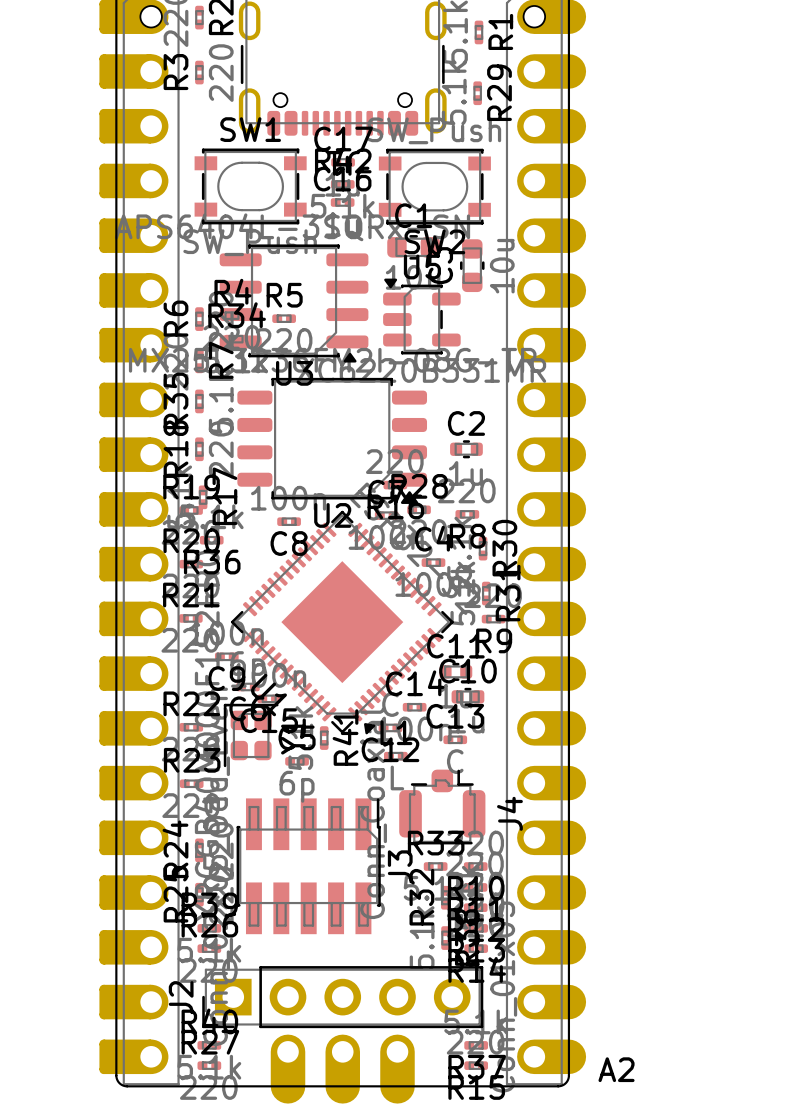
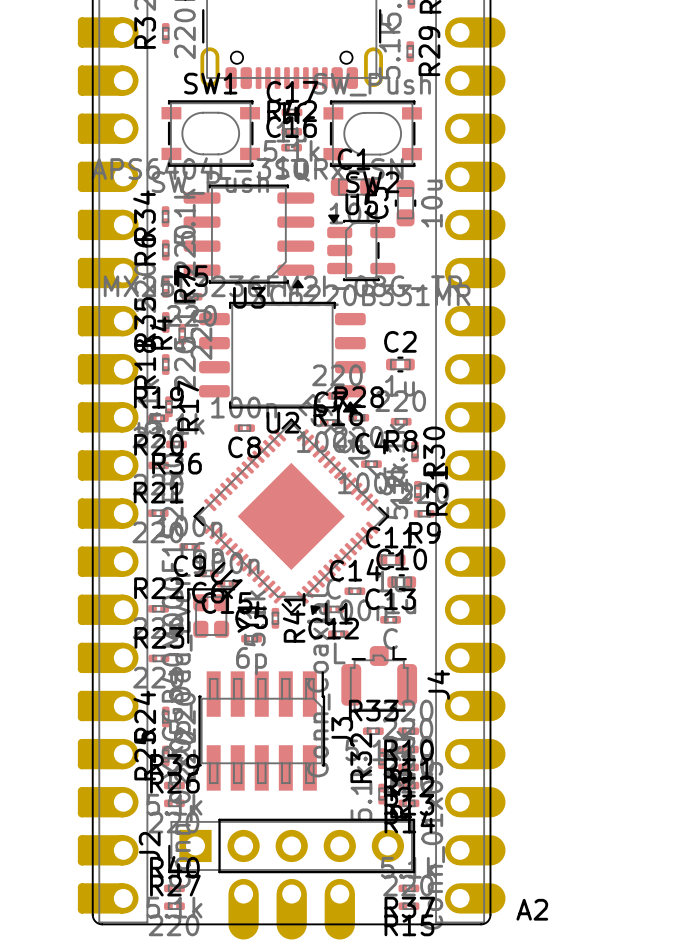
R4 rotation: 0° (231, 315) -> 90° clockwise (182, 334)
R4 position: (231, 315) -> (182, 334)
R5 position: (284, 318) -> (192, 296)
R34 rotation: 0° (236, 339) -> 90° clockwise (165, 216)
R34 position: (236, 339) -> (165, 216)

